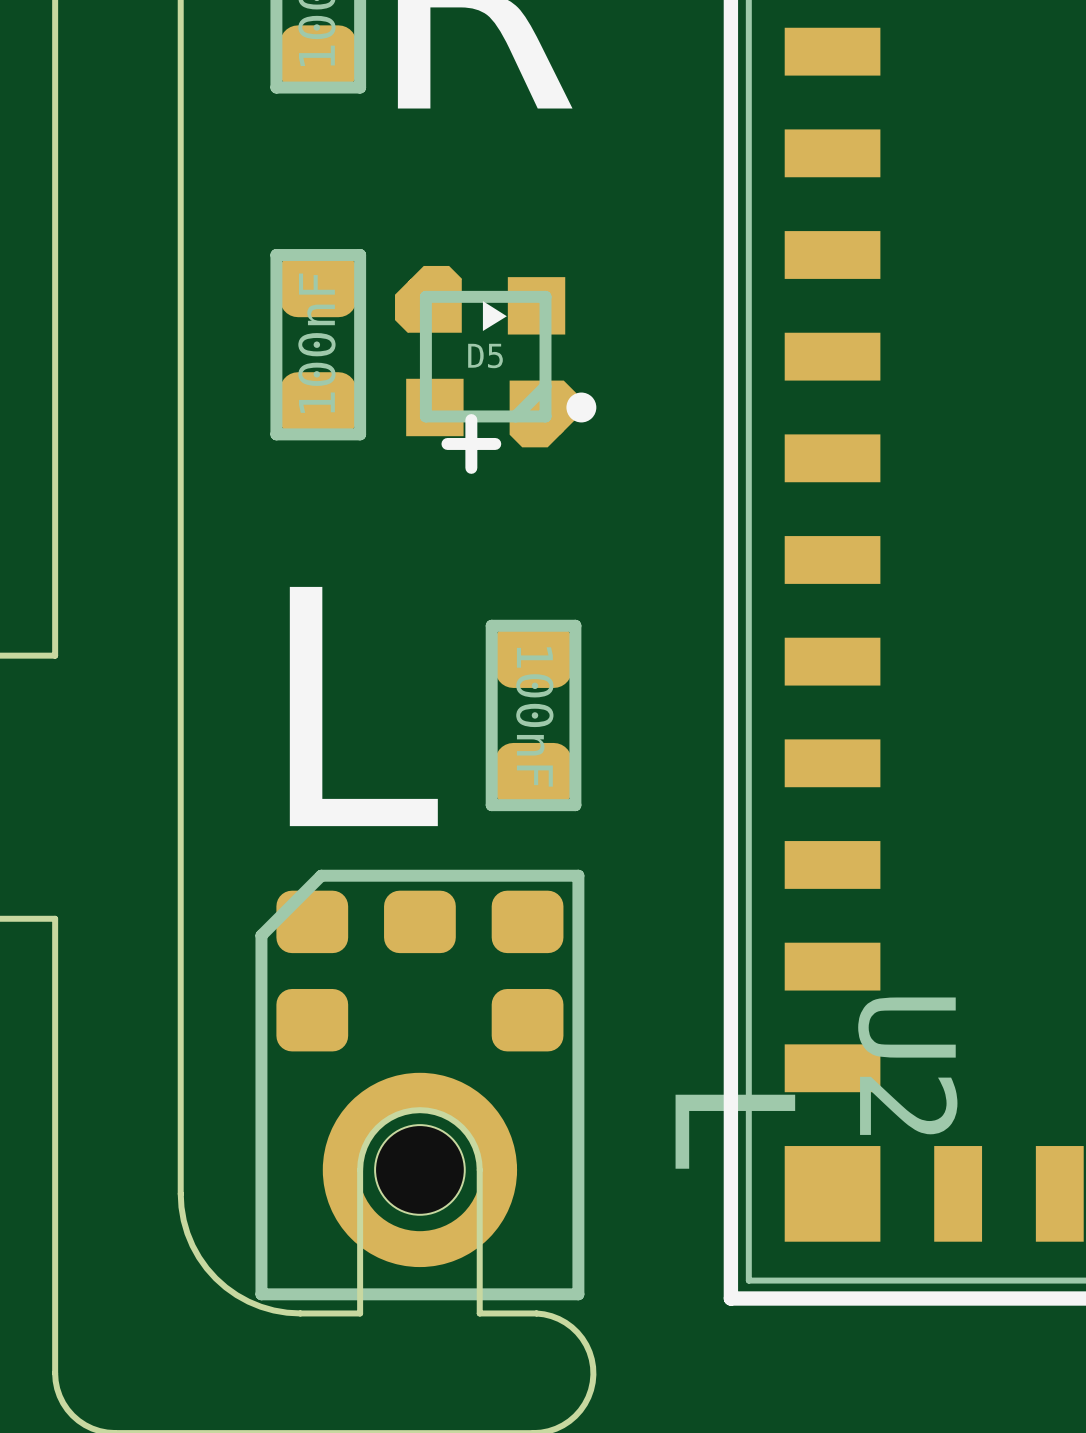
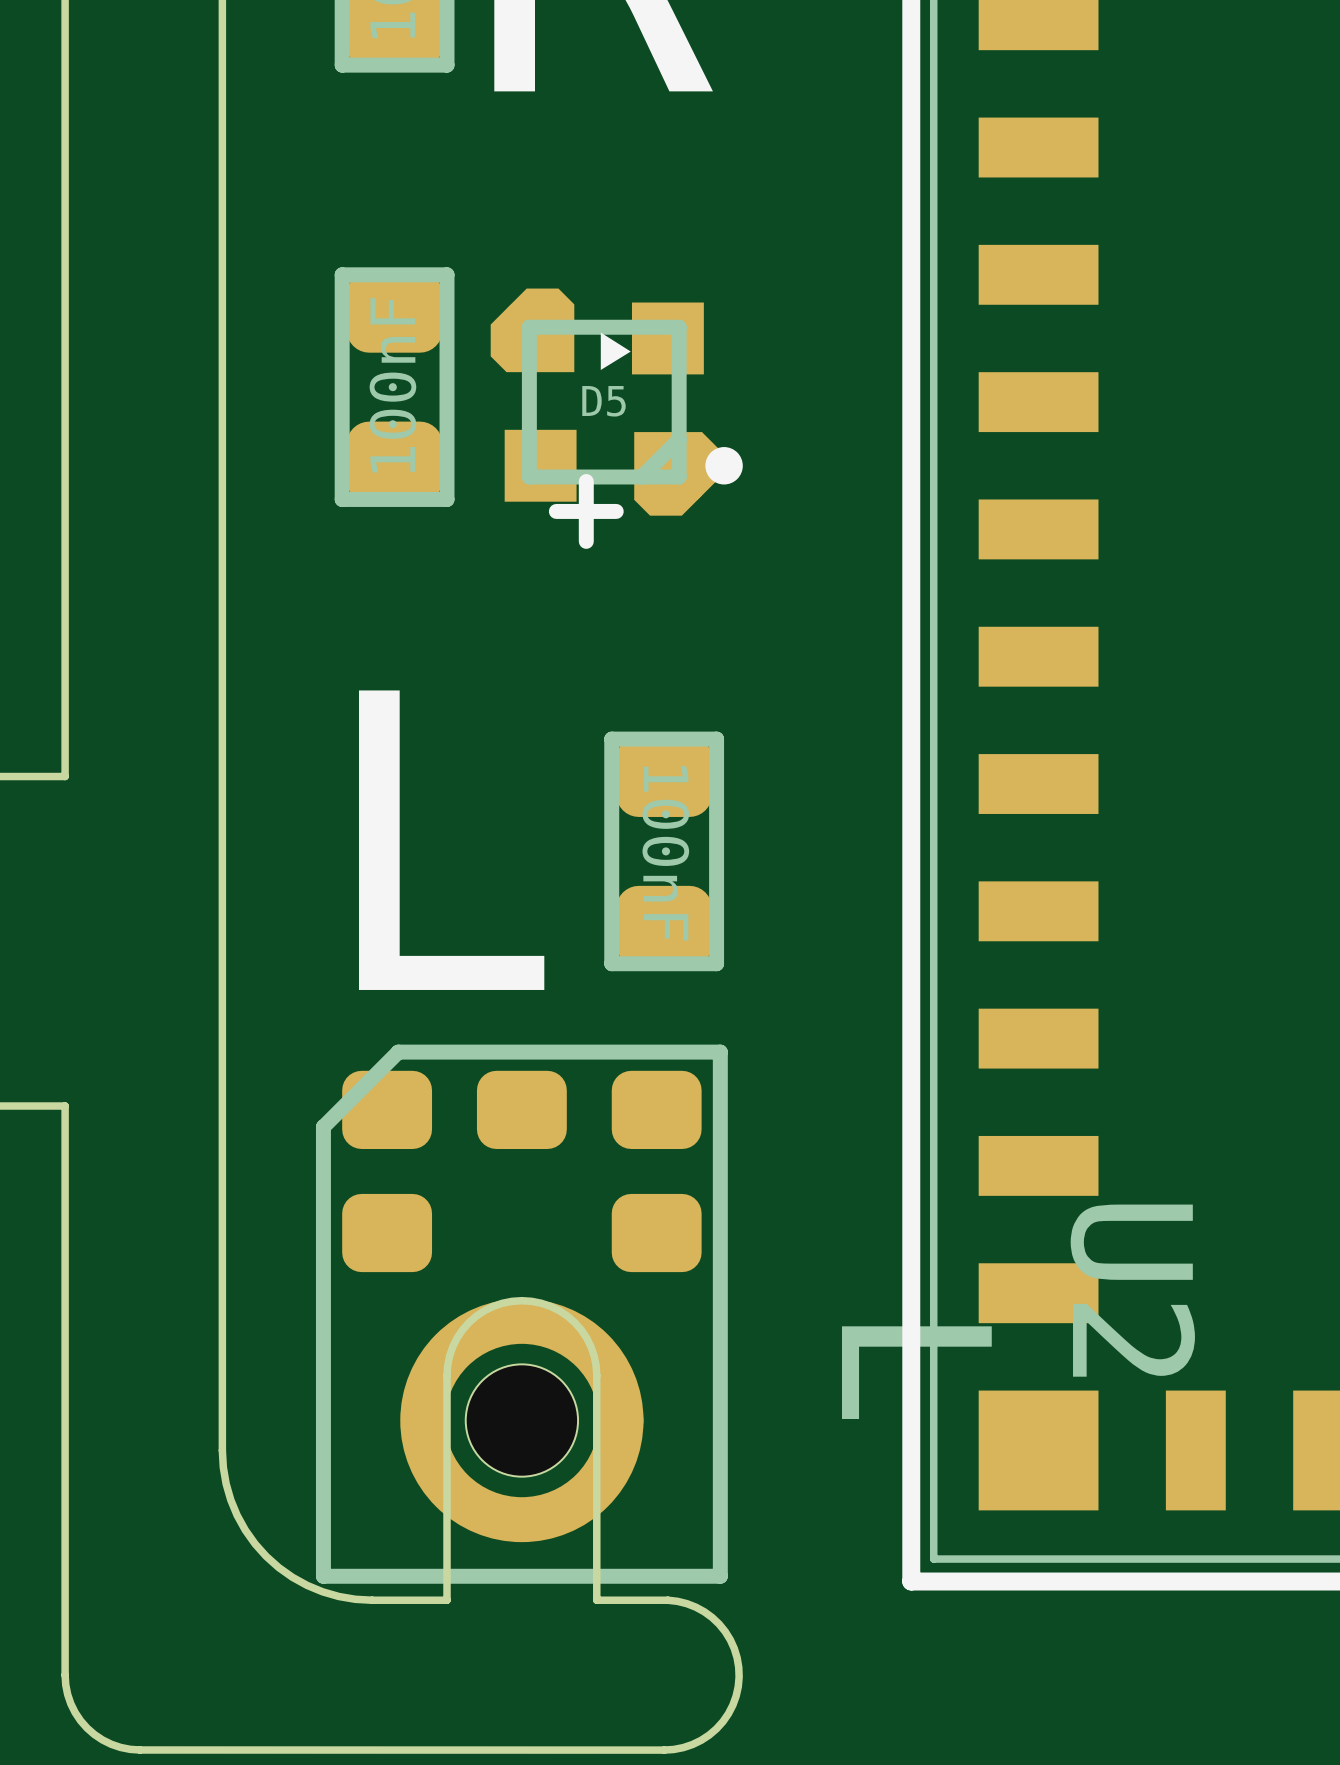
board edge: (360, 1169) (364, 1147) (377, 1127) (397, 1114) (419, 1110) (442, 1114) (462, 1127) (475, 1147) (479, 1169) -> (447, 1420) (447, 1365) (457, 1338) (468, 1322) (484, 1310) (502, 1303) (521, 1300) (541, 1303) (559, 1310) (574, 1322) (586, 1338) (596, 1365) (596, 1420)

